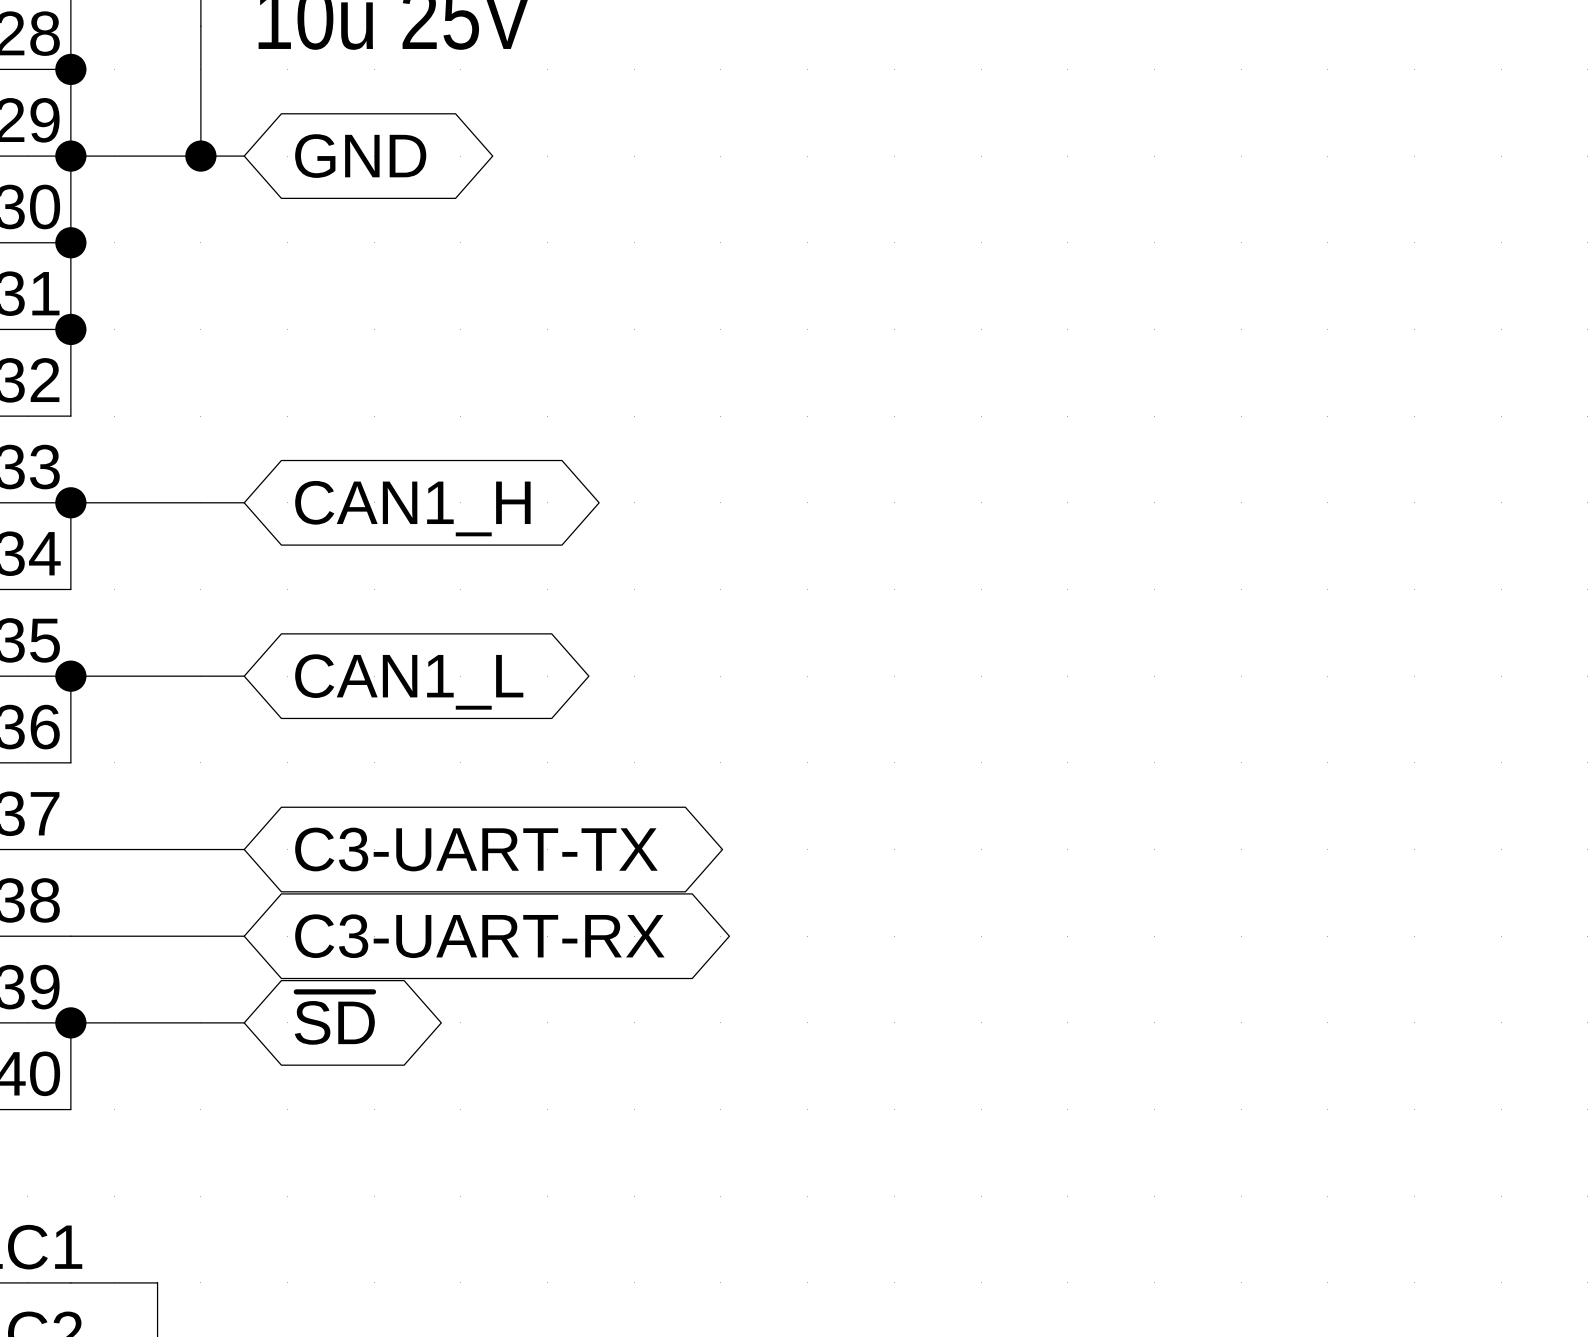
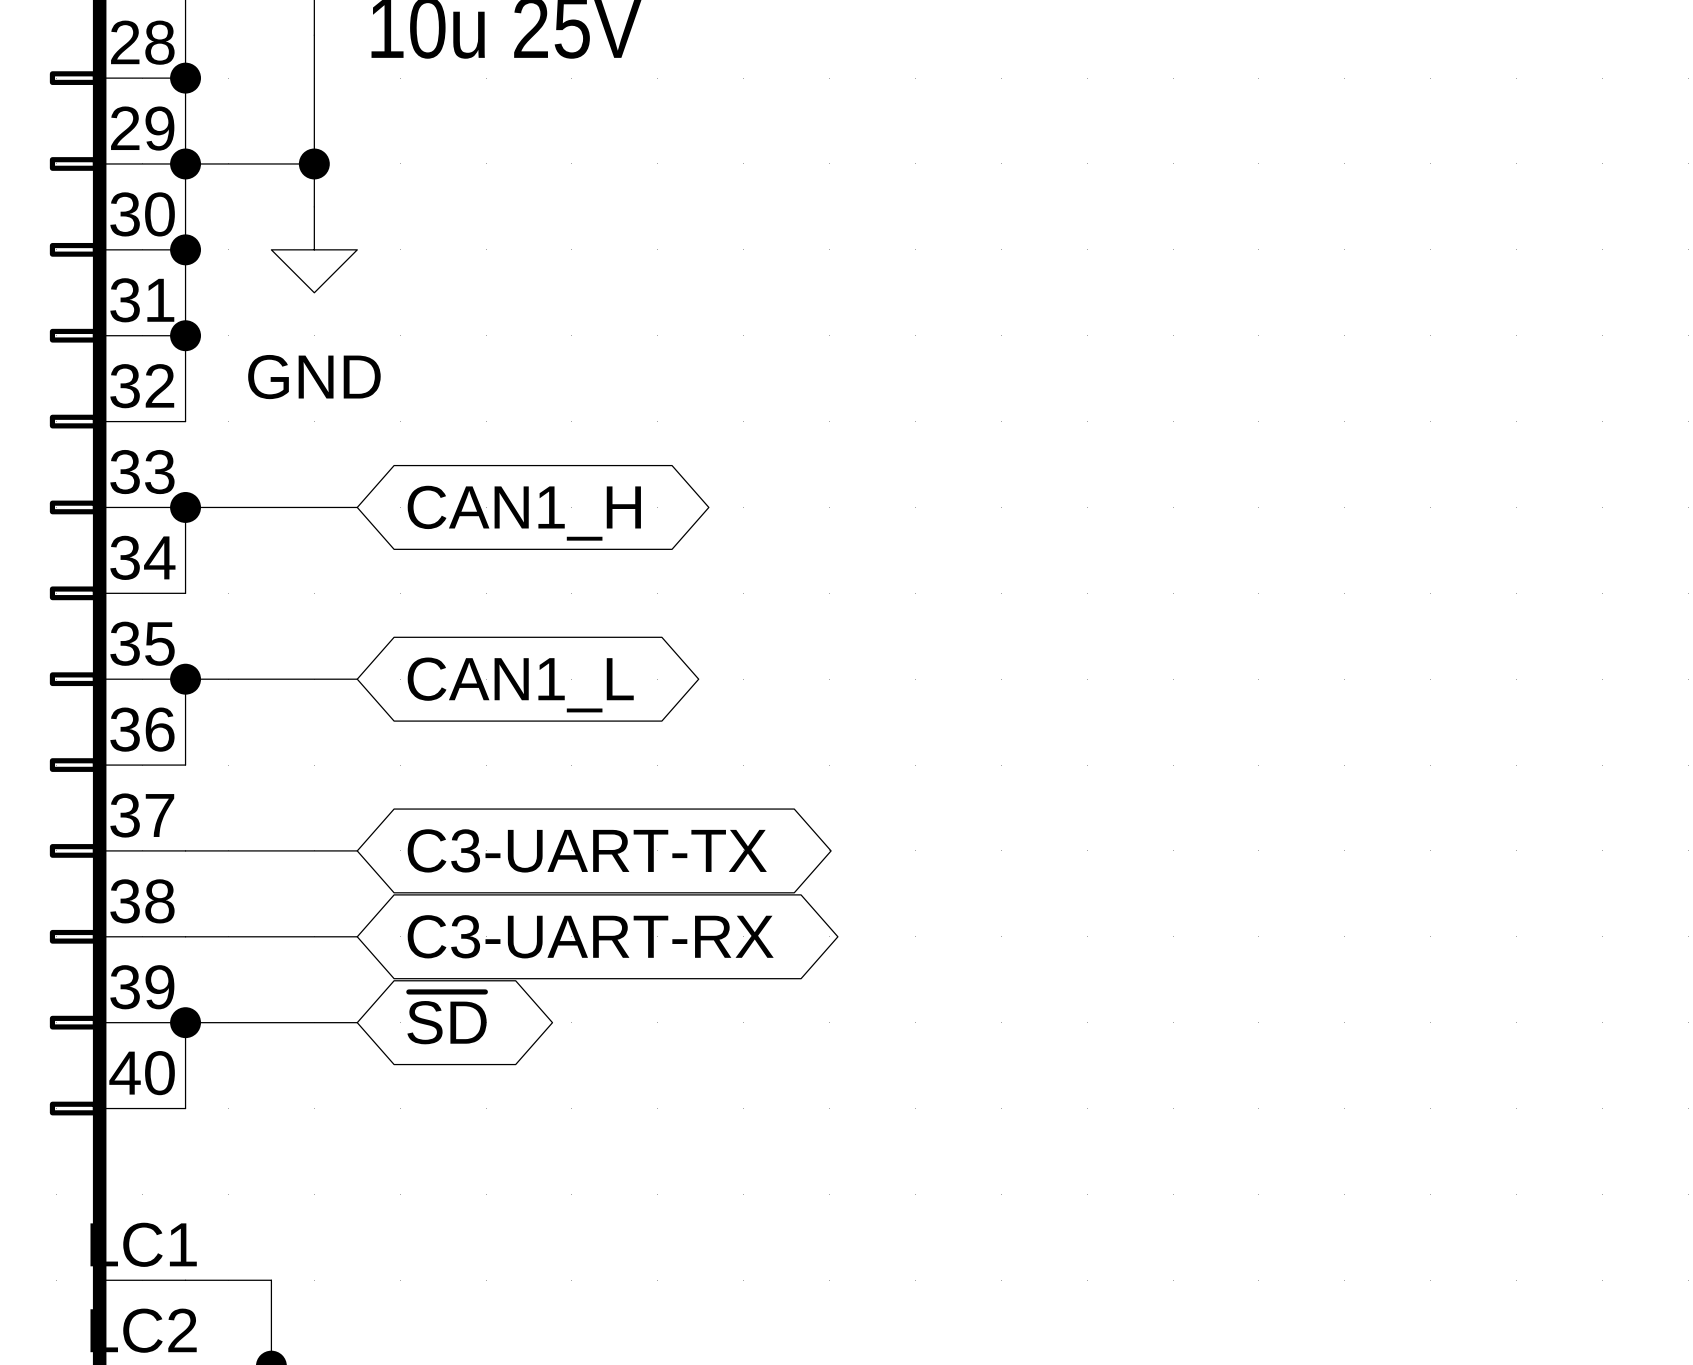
wire: (200, 156) (244, 156) -> (314, 163) (314, 206)
global label: GND (360, 156) -> none
power symbol: none -> GND (314, 249)

